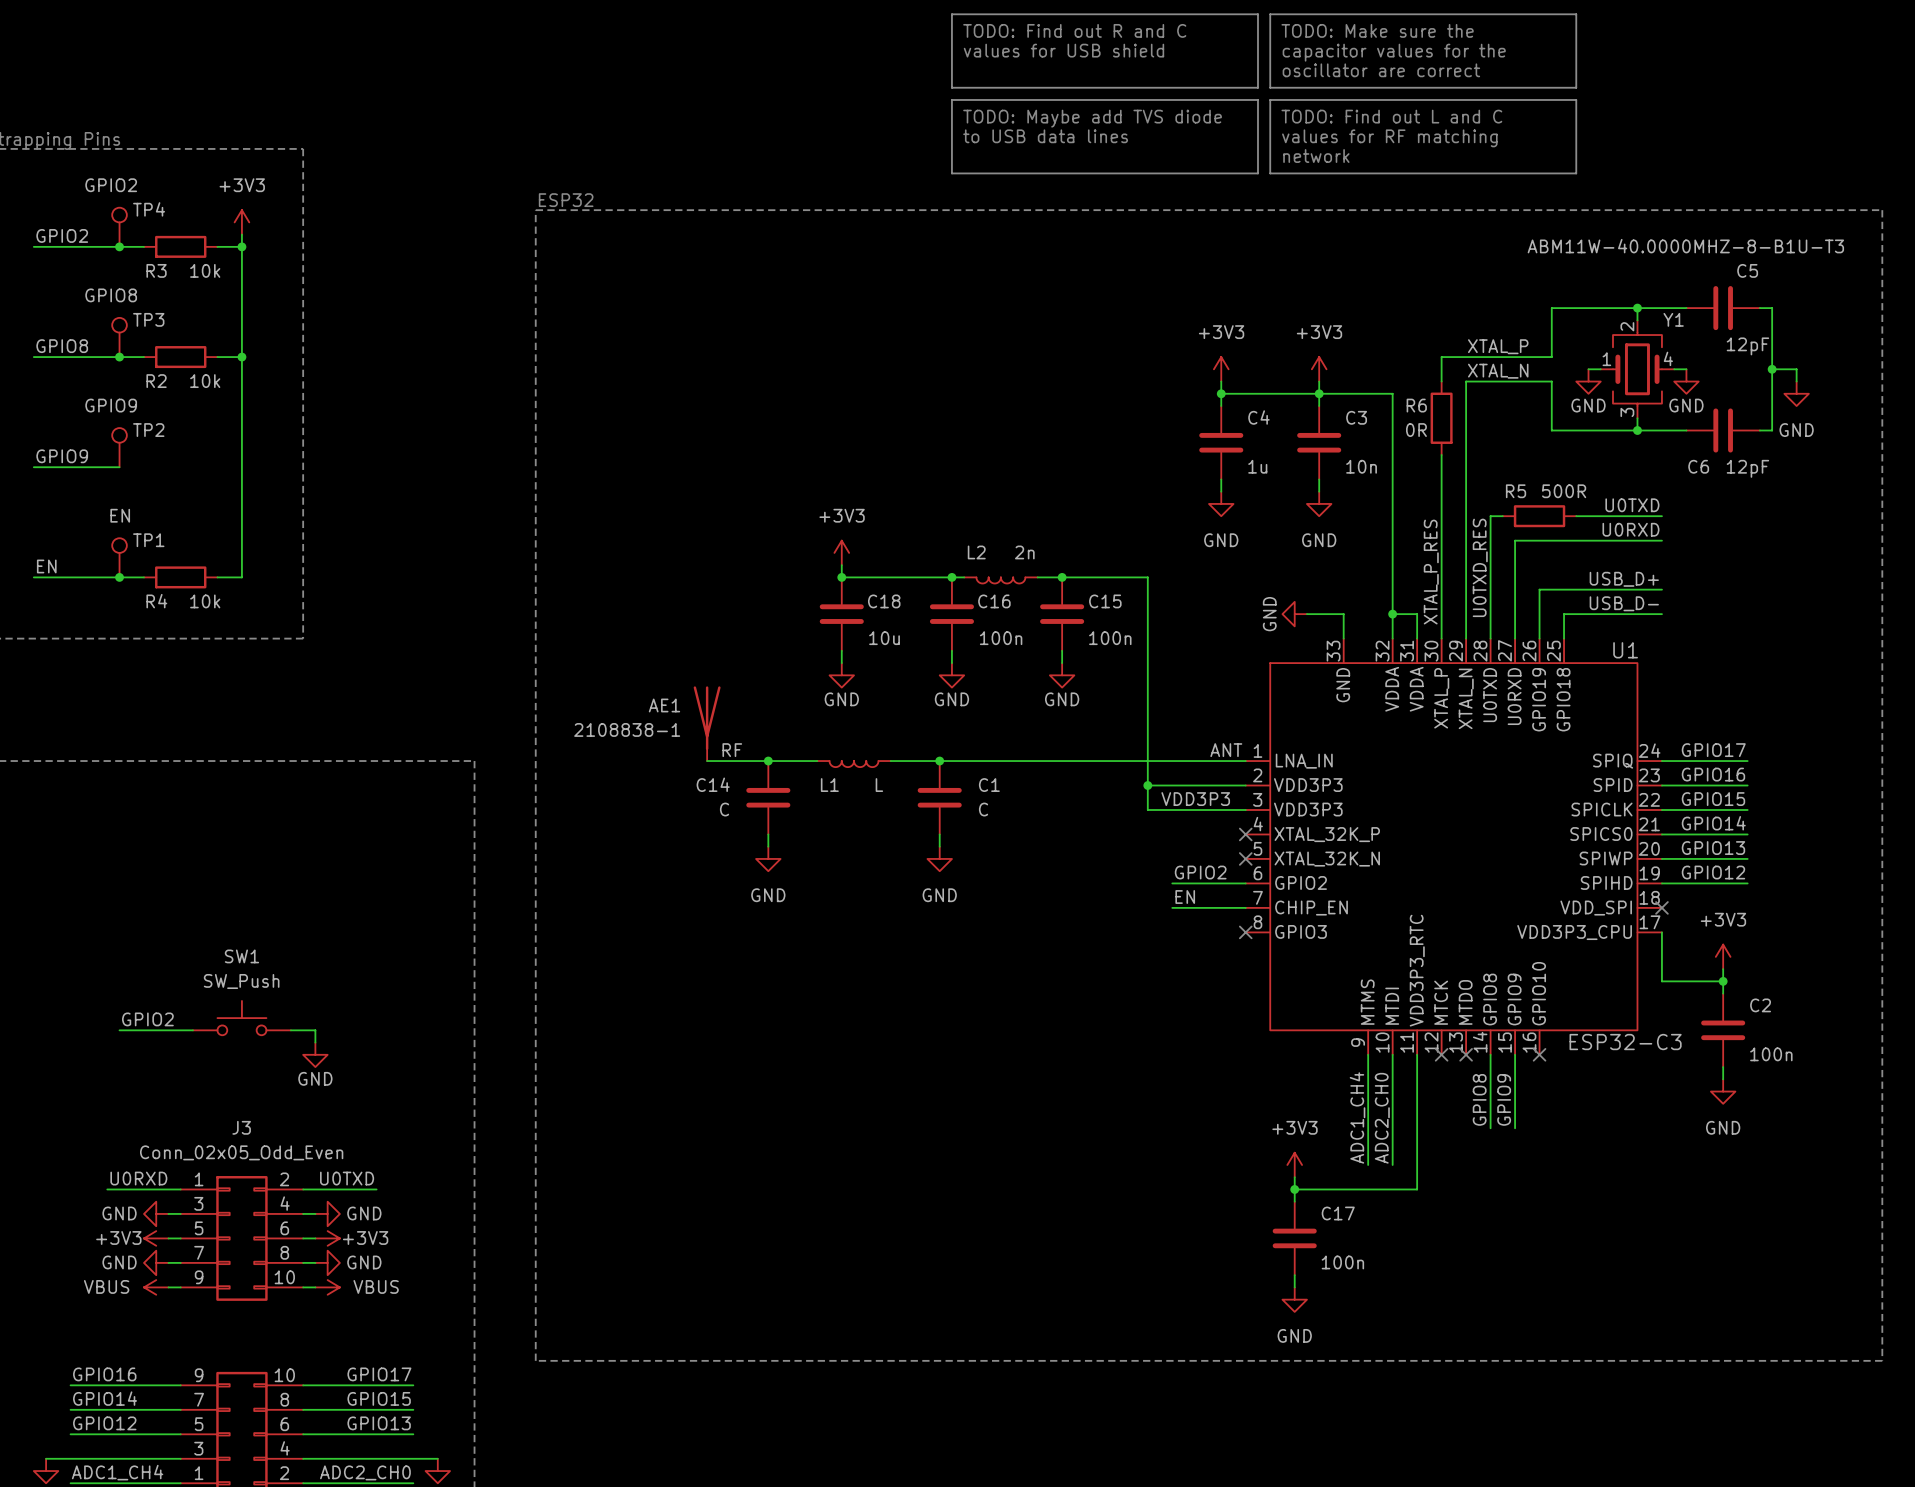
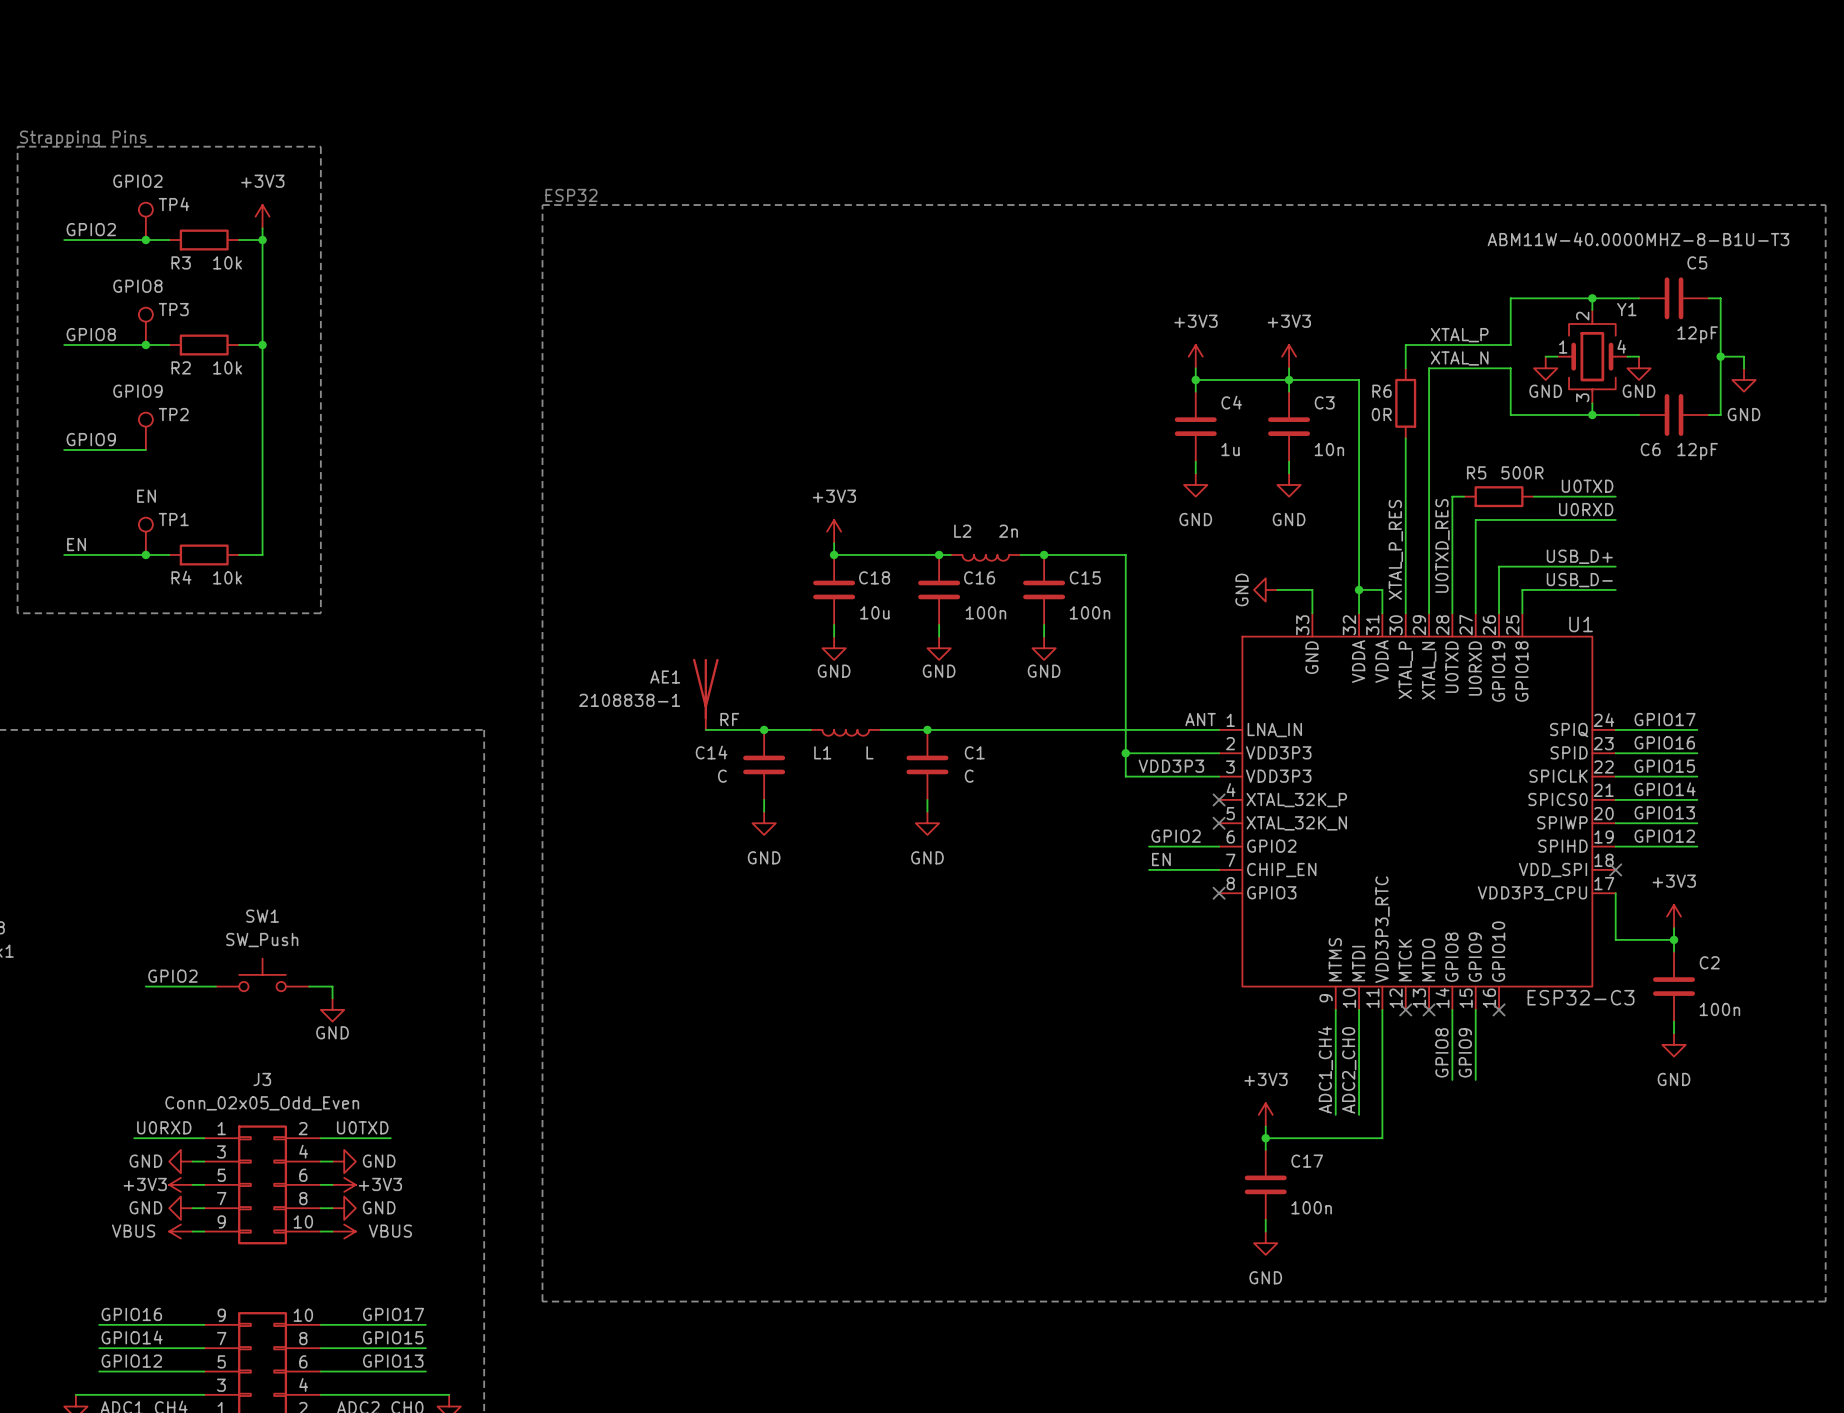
line: (951, 14) (951, 87) (1257, 87) (1257, 14) (951, 14) -> none
line: (1270, 14) (1270, 87) (1576, 87) (1576, 14) (1270, 14) -> none
text: TODO: Find out R and C (1074, 30) -> none
text: TODO: Make sure the (1377, 30) -> none
text: values for USB shield (1063, 50) -> none
text: capacitor values for the (1394, 52) -> none
text: oscillator are correct (1381, 70) -> none
line: (951, 99) (1257, 99) (1257, 173) (951, 173) (951, 99) -> none
line: (1270, 99) (1576, 99) (1576, 173) (1270, 173) (1270, 99) -> none
text: TODO: Find out L and C (1391, 116) -> none
text: TODO: Maybe add TVS diode (1092, 118) -> none
text: to USB data lines (1045, 136) -> none
text: values for RF matching (1389, 138) -> none
text: network (1316, 156) -> none

